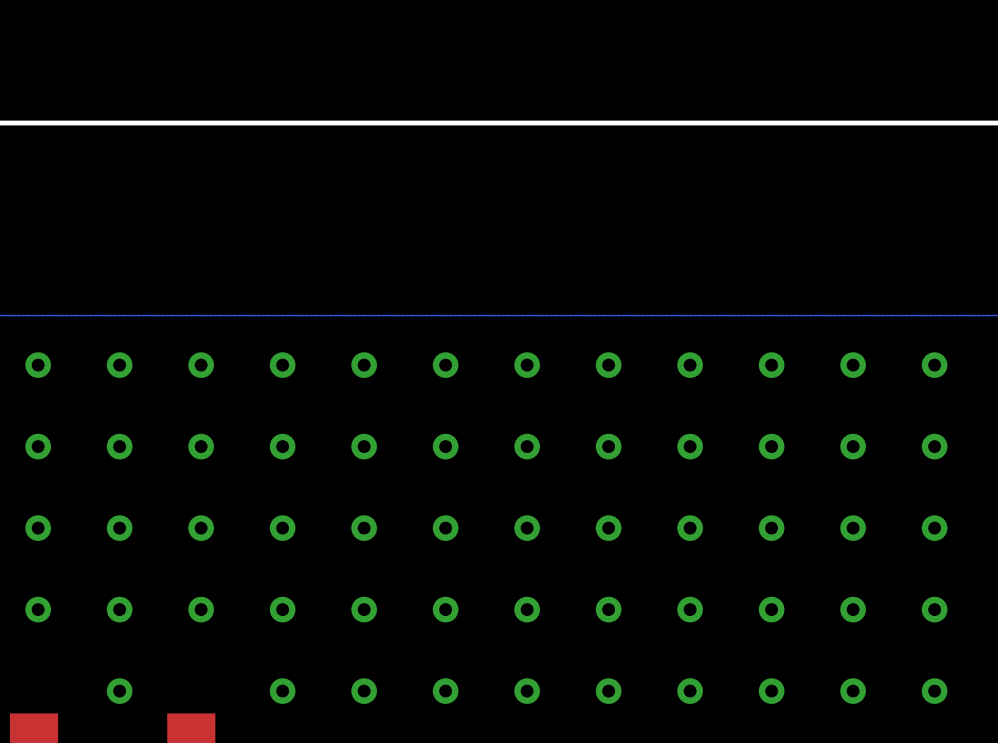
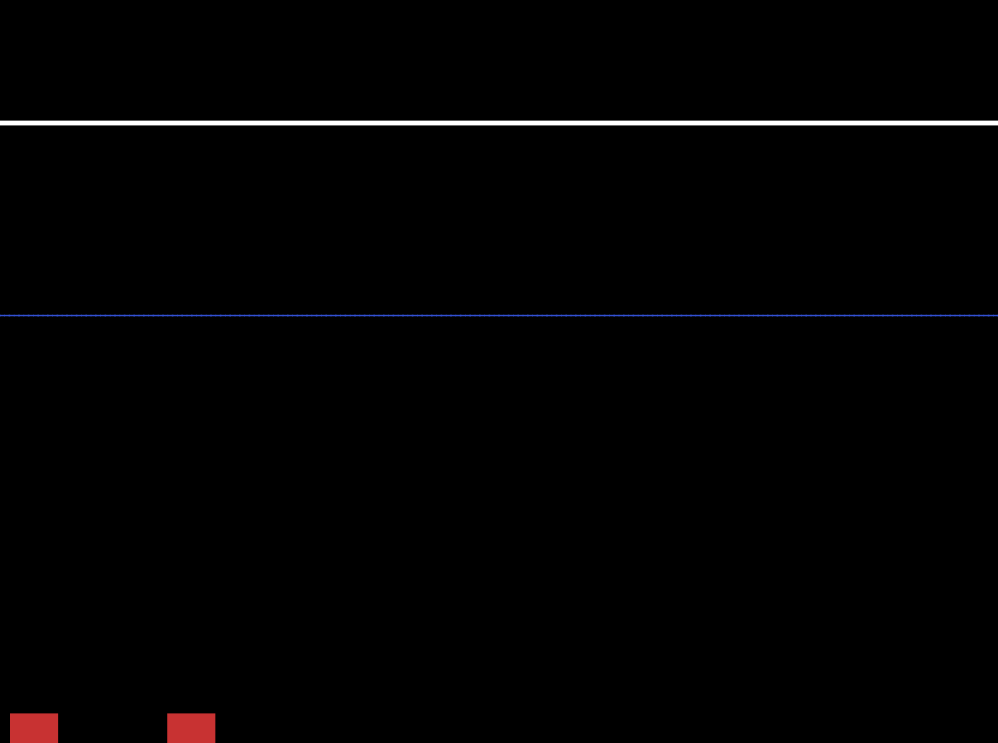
via: (38, 365) -> none
via: (119, 365) -> none
via: (201, 365) -> none
via: (282, 365) -> none
via: (364, 365) -> none
via: (445, 365) -> none
via: (527, 365) -> none
via: (608, 365) -> none
via: (690, 365) -> none
via: (771, 365) -> none
via: (853, 365) -> none
via: (934, 365) -> none
via: (38, 446) -> none
via: (119, 446) -> none
via: (201, 446) -> none
via: (282, 446) -> none
via: (364, 446) -> none
via: (445, 446) -> none
via: (527, 446) -> none
via: (608, 446) -> none
via: (690, 446) -> none
via: (771, 446) -> none
via: (853, 446) -> none
via: (934, 446) -> none
via: (38, 528) -> none
via: (119, 528) -> none
via: (201, 528) -> none
via: (282, 528) -> none
via: (364, 528) -> none
via: (445, 528) -> none
via: (527, 528) -> none
via: (608, 528) -> none
via: (690, 528) -> none
via: (771, 528) -> none
via: (853, 528) -> none
via: (934, 528) -> none
via: (38, 609) -> none
via: (119, 609) -> none
via: (201, 609) -> none
via: (282, 609) -> none
via: (364, 609) -> none
via: (445, 609) -> none
via: (527, 609) -> none
via: (608, 609) -> none
via: (690, 609) -> none
via: (771, 609) -> none
via: (853, 609) -> none
via: (934, 609) -> none
via: (119, 691) -> none
via: (282, 691) -> none
via: (364, 691) -> none
via: (445, 691) -> none
via: (527, 691) -> none
via: (608, 691) -> none
via: (690, 691) -> none
via: (771, 691) -> none
via: (853, 691) -> none
via: (934, 691) -> none

